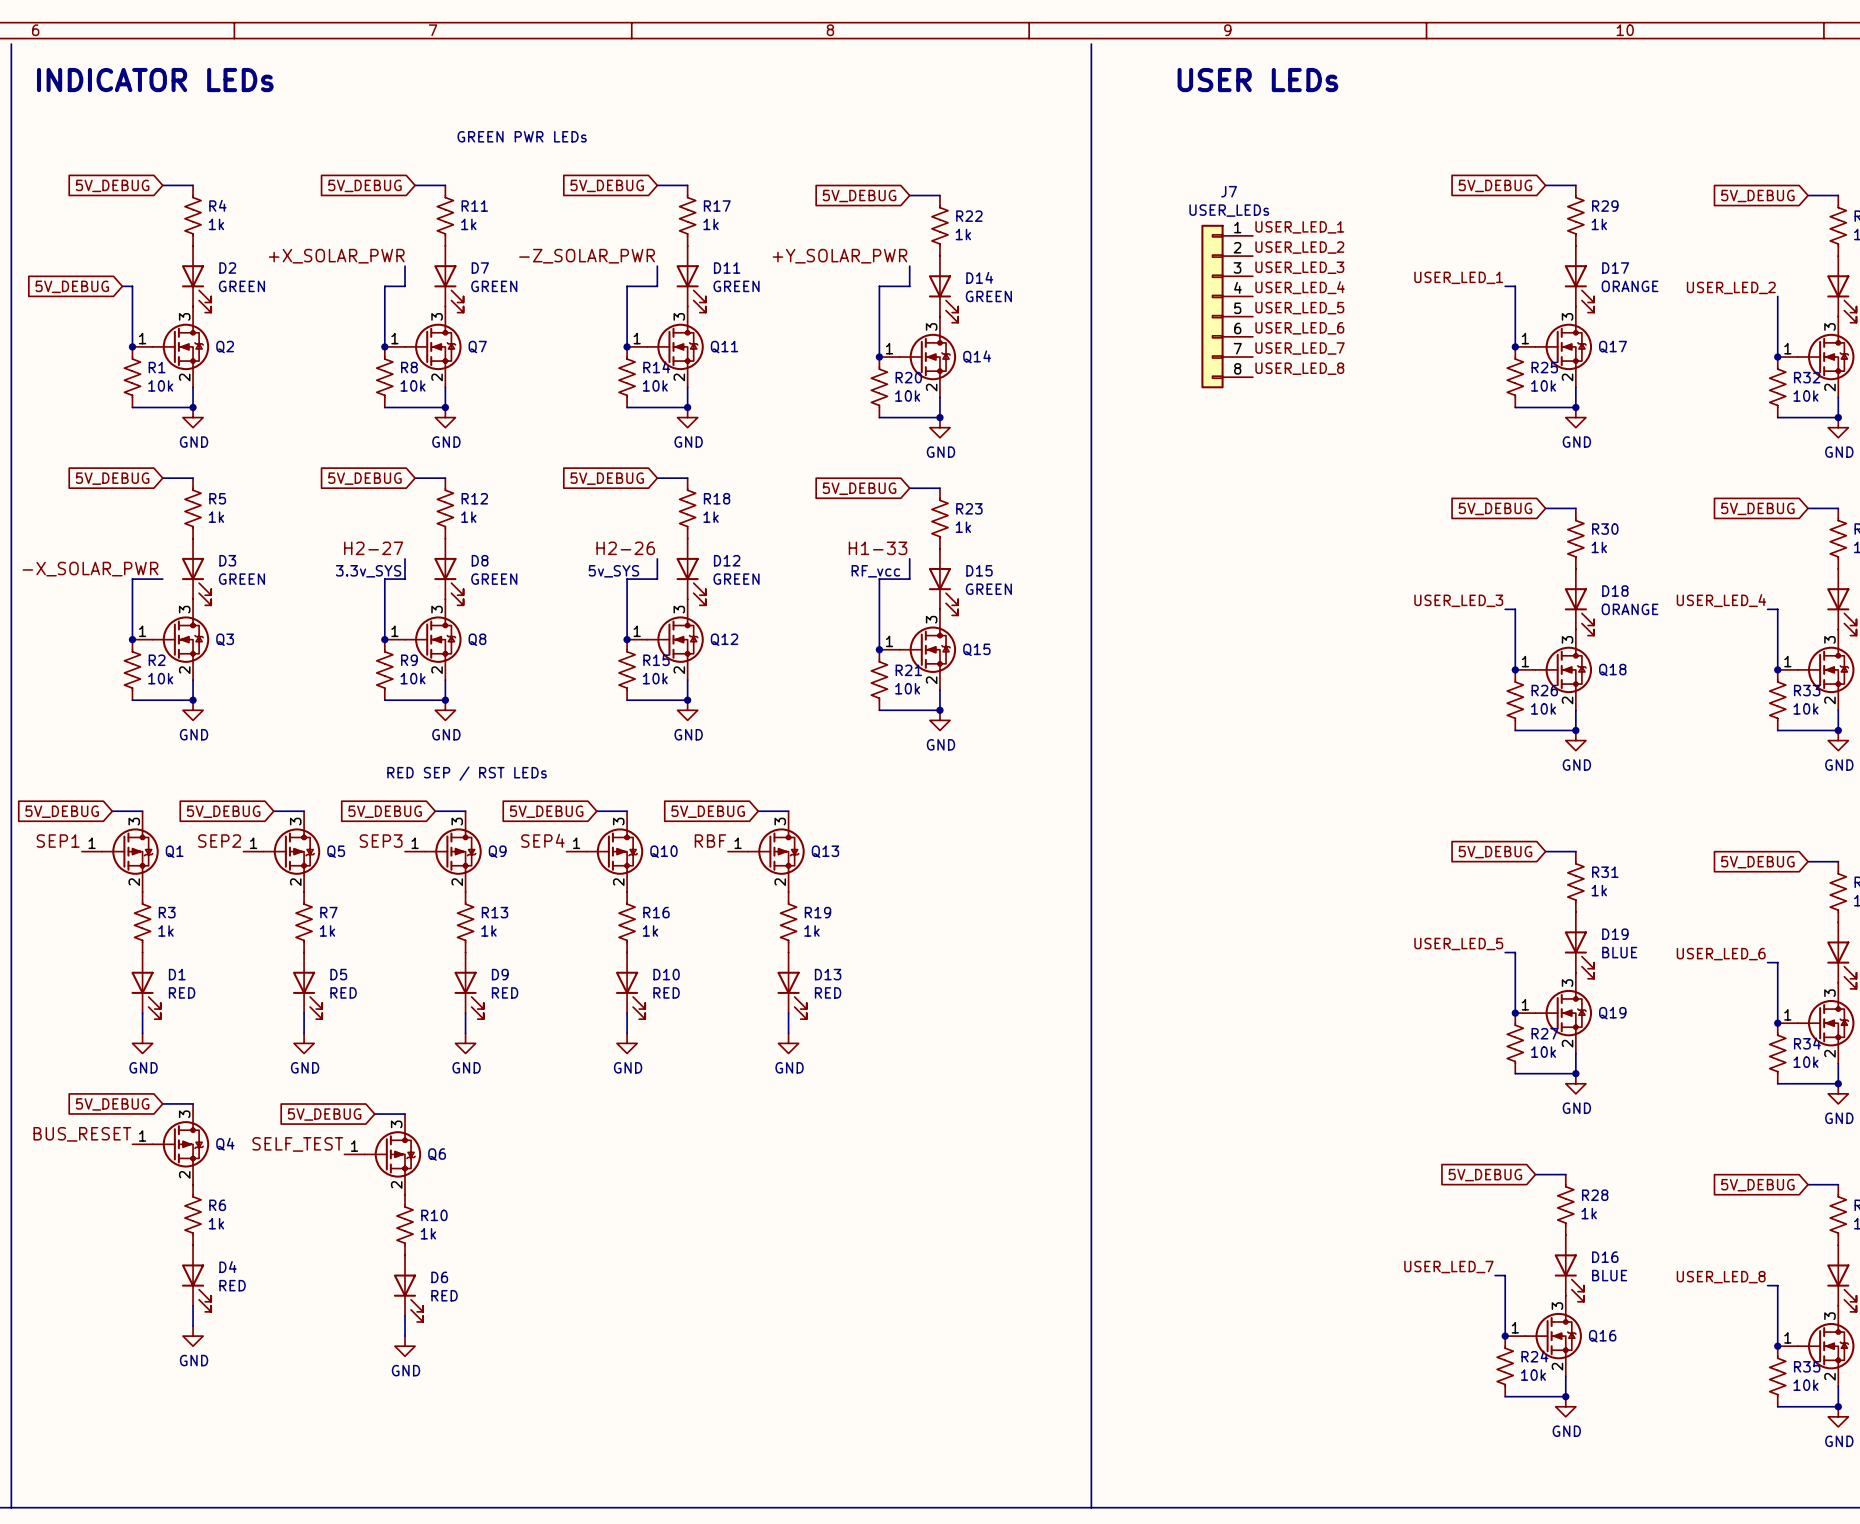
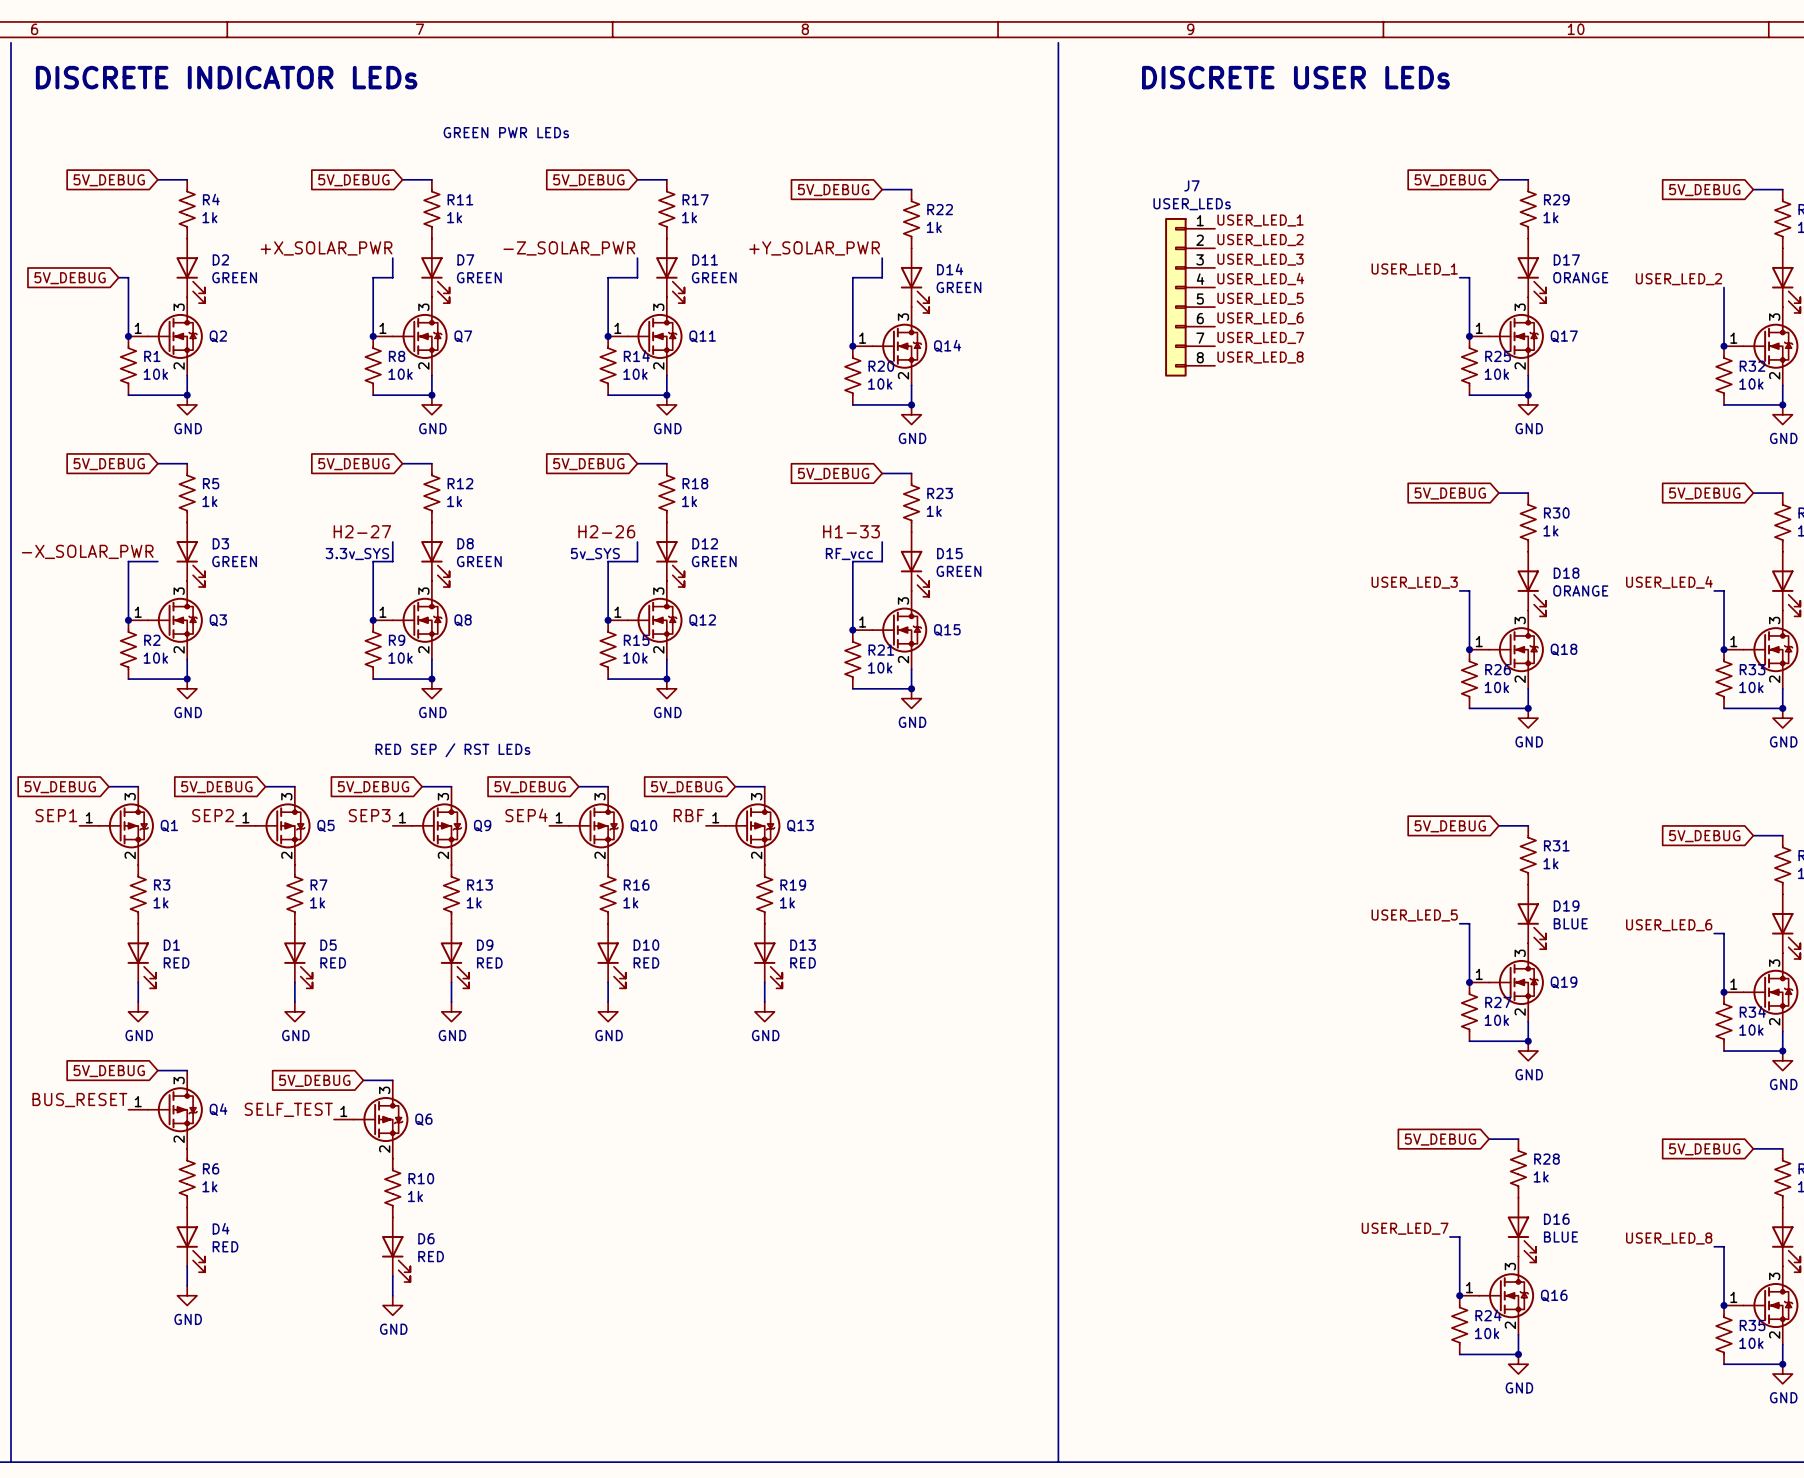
text: INDICATOR LEDs (155, 80) -> DISCRETE INDICATOR LEDs (226, 77)
text: USER LEDs (1257, 80) -> DISCRETE USER LEDs (1295, 77)

